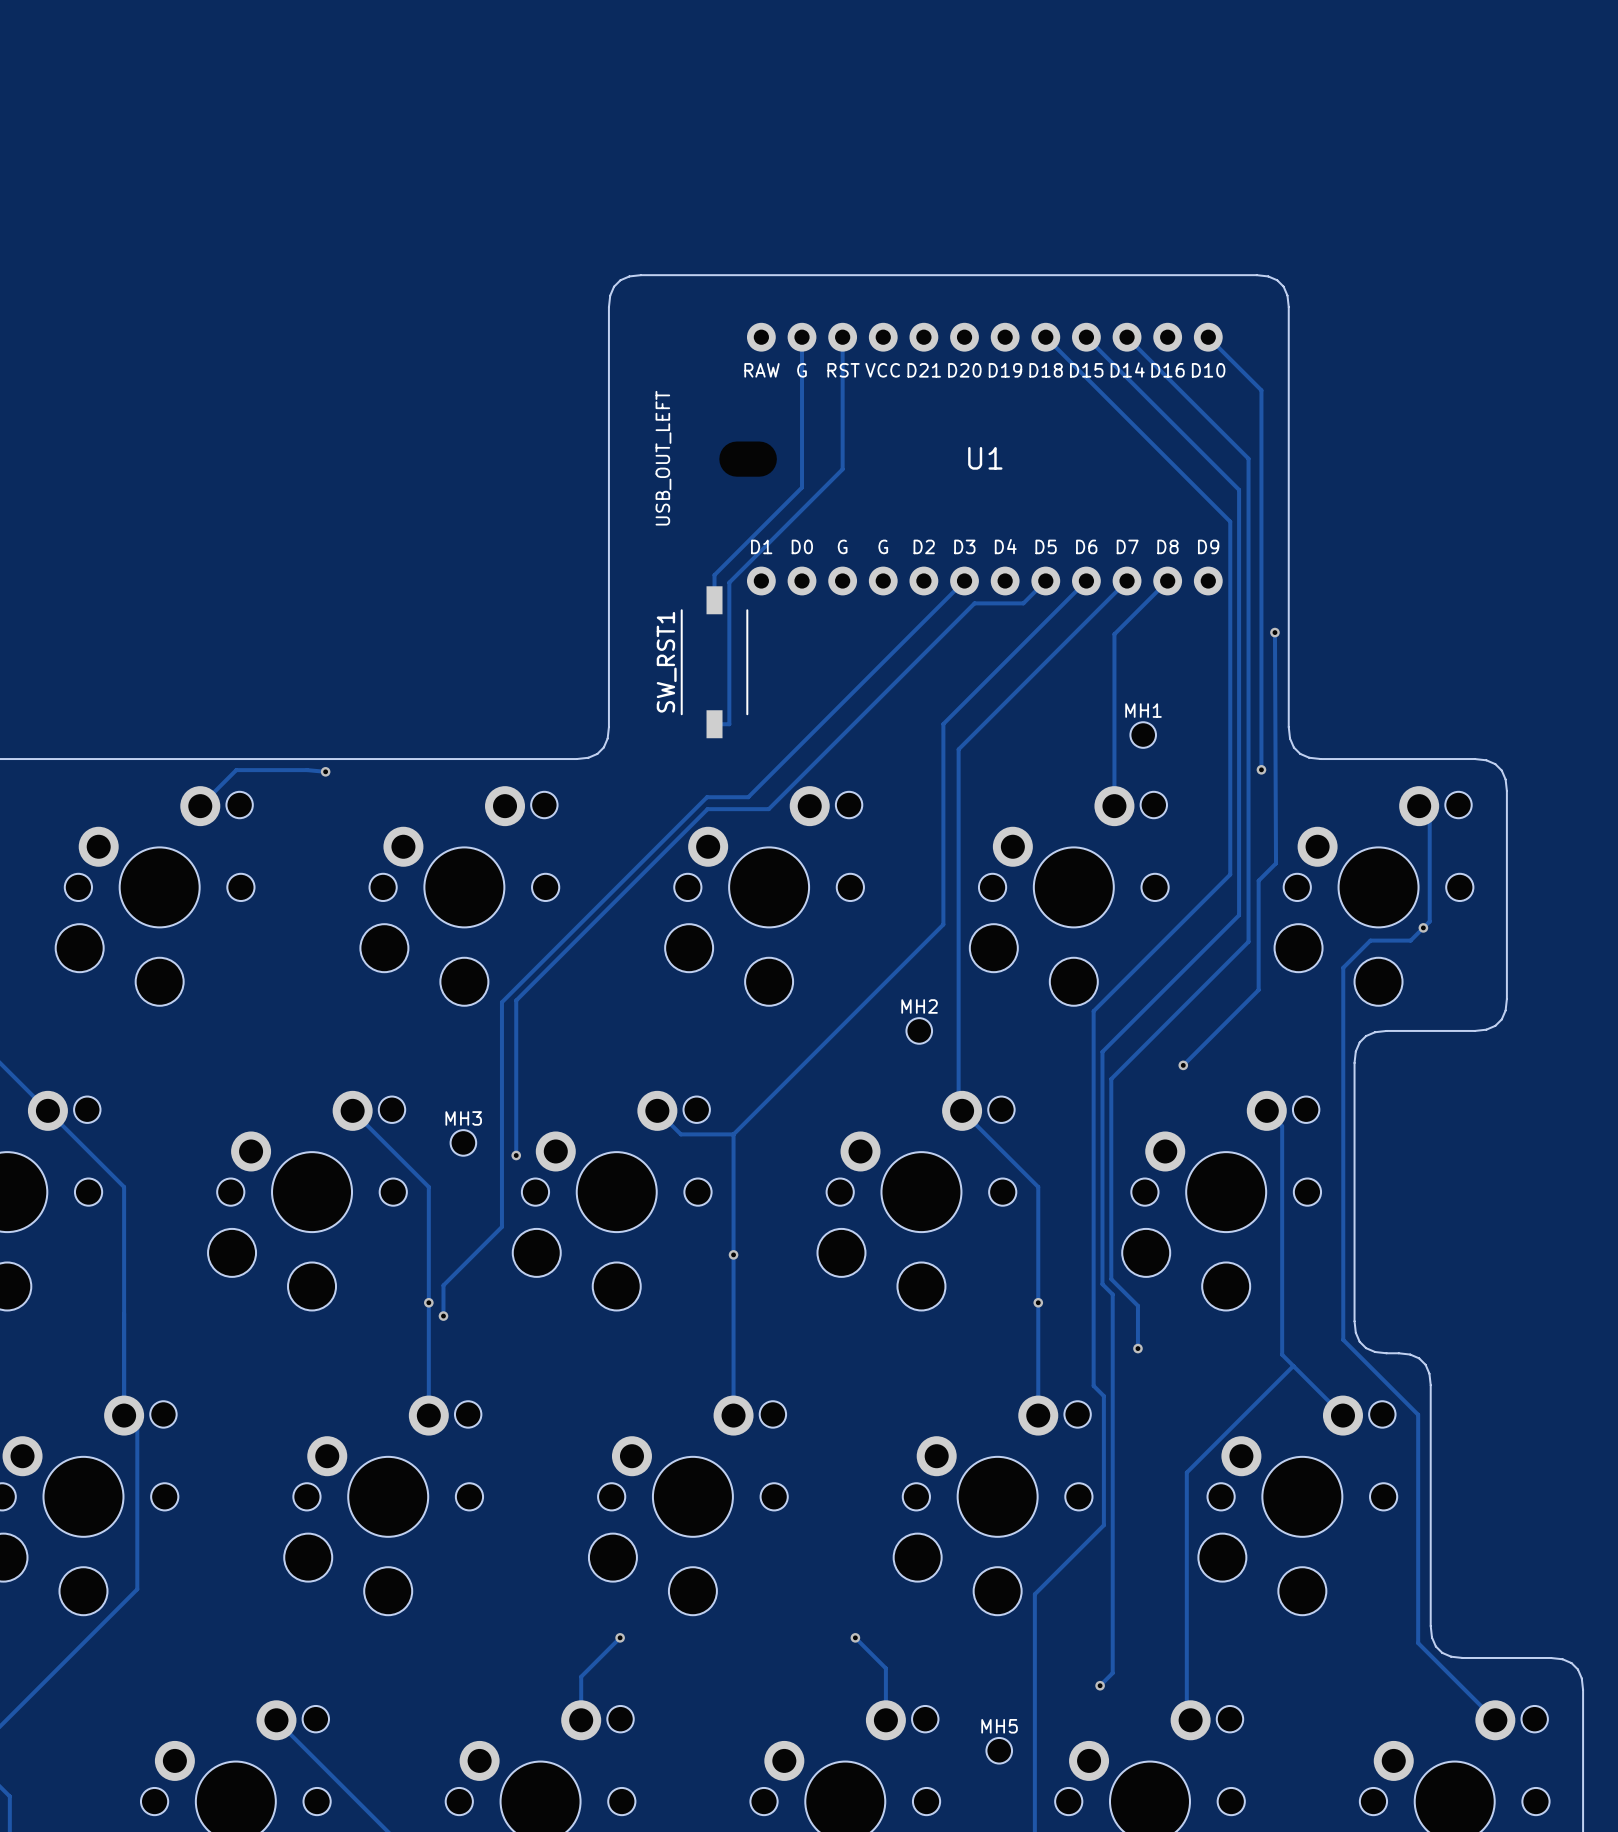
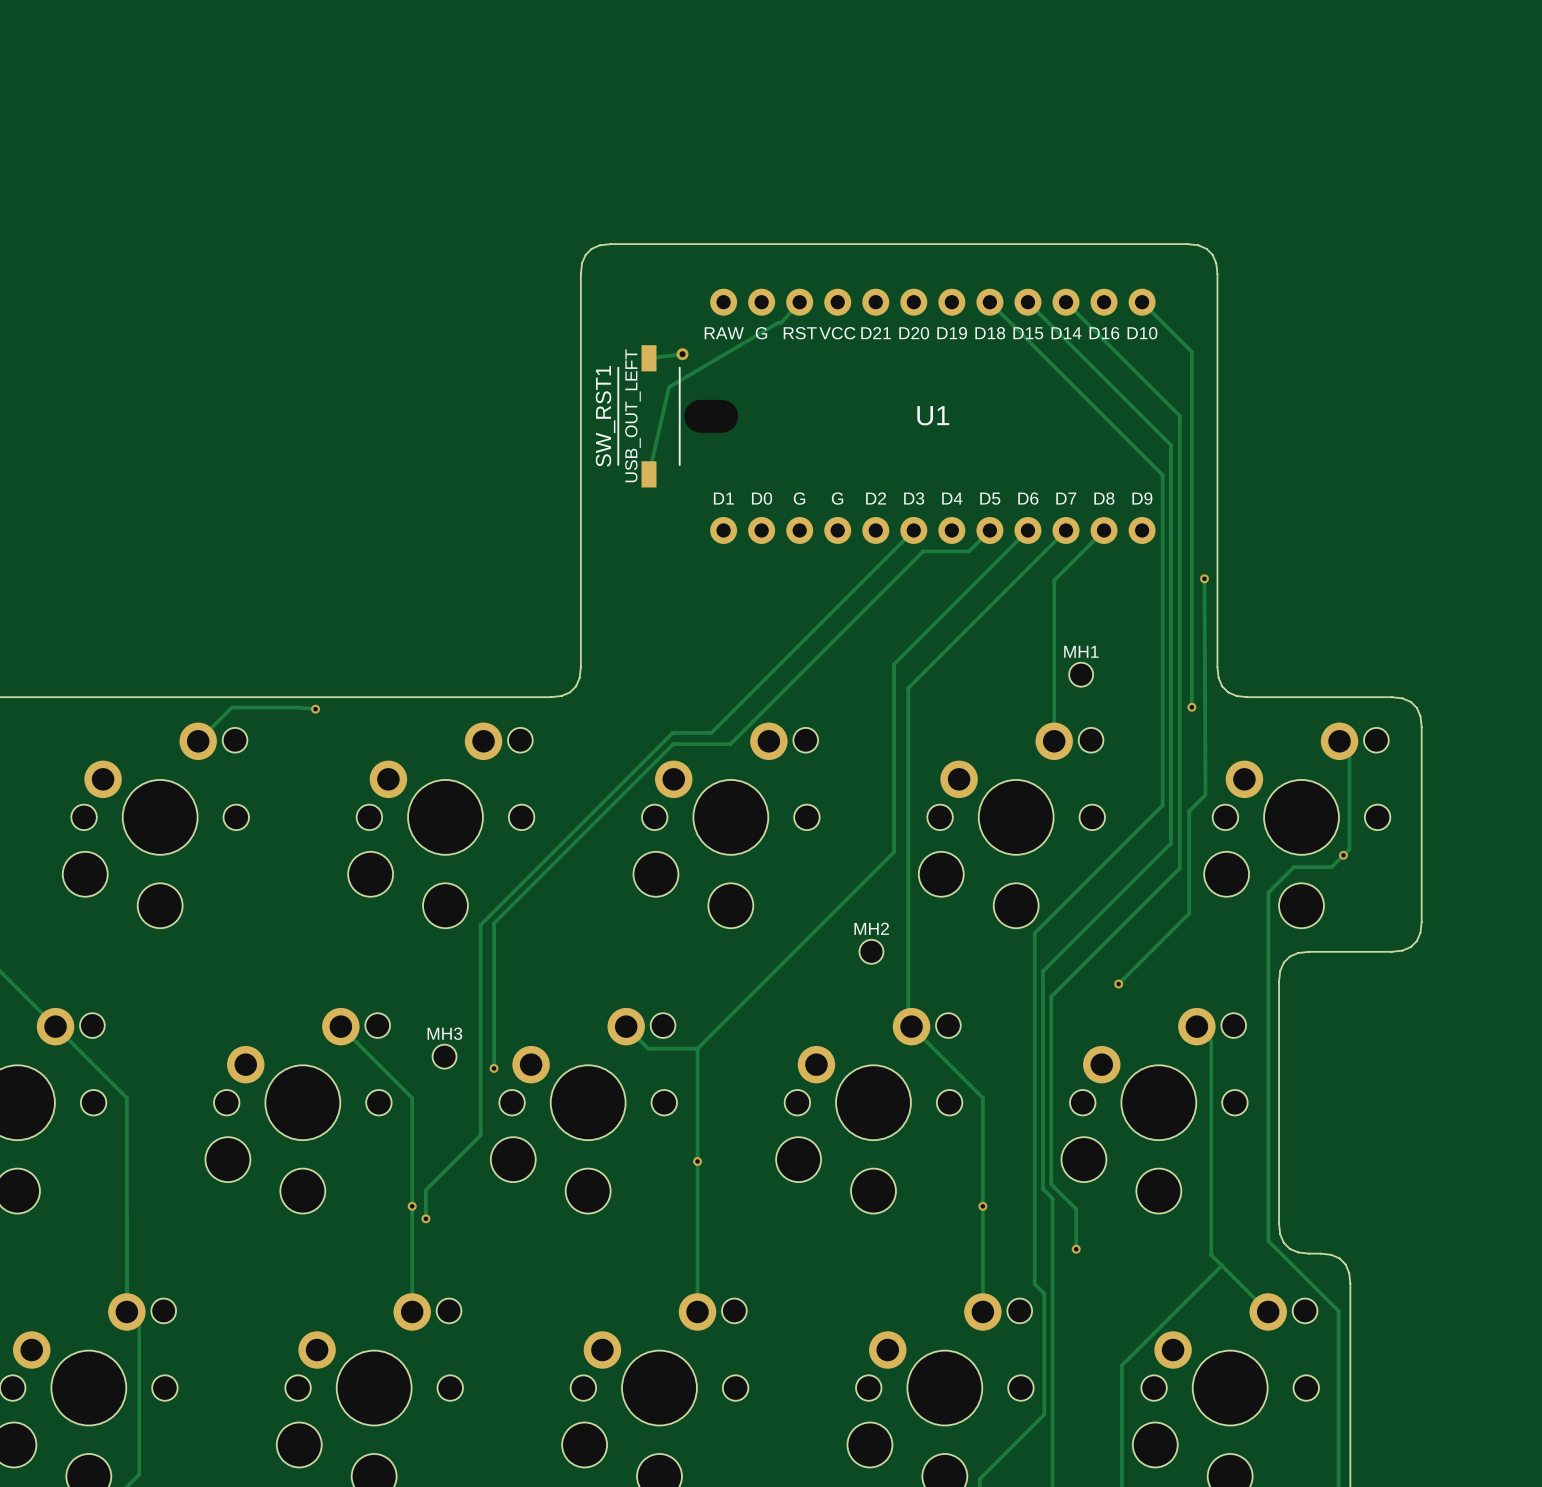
track: (802, 337) (802, 487) (714, 575) (714, 600) -> none
track: (842, 337) (842, 469) (729, 582) (729, 724) (714, 724) -> (799, 302) (781, 322) (669, 387) (649, 474)
track: none -> (682, 354) (649, 358)
via: none -> (682, 354)
SW_RST1 position: (714, 662) -> (649, 416)

